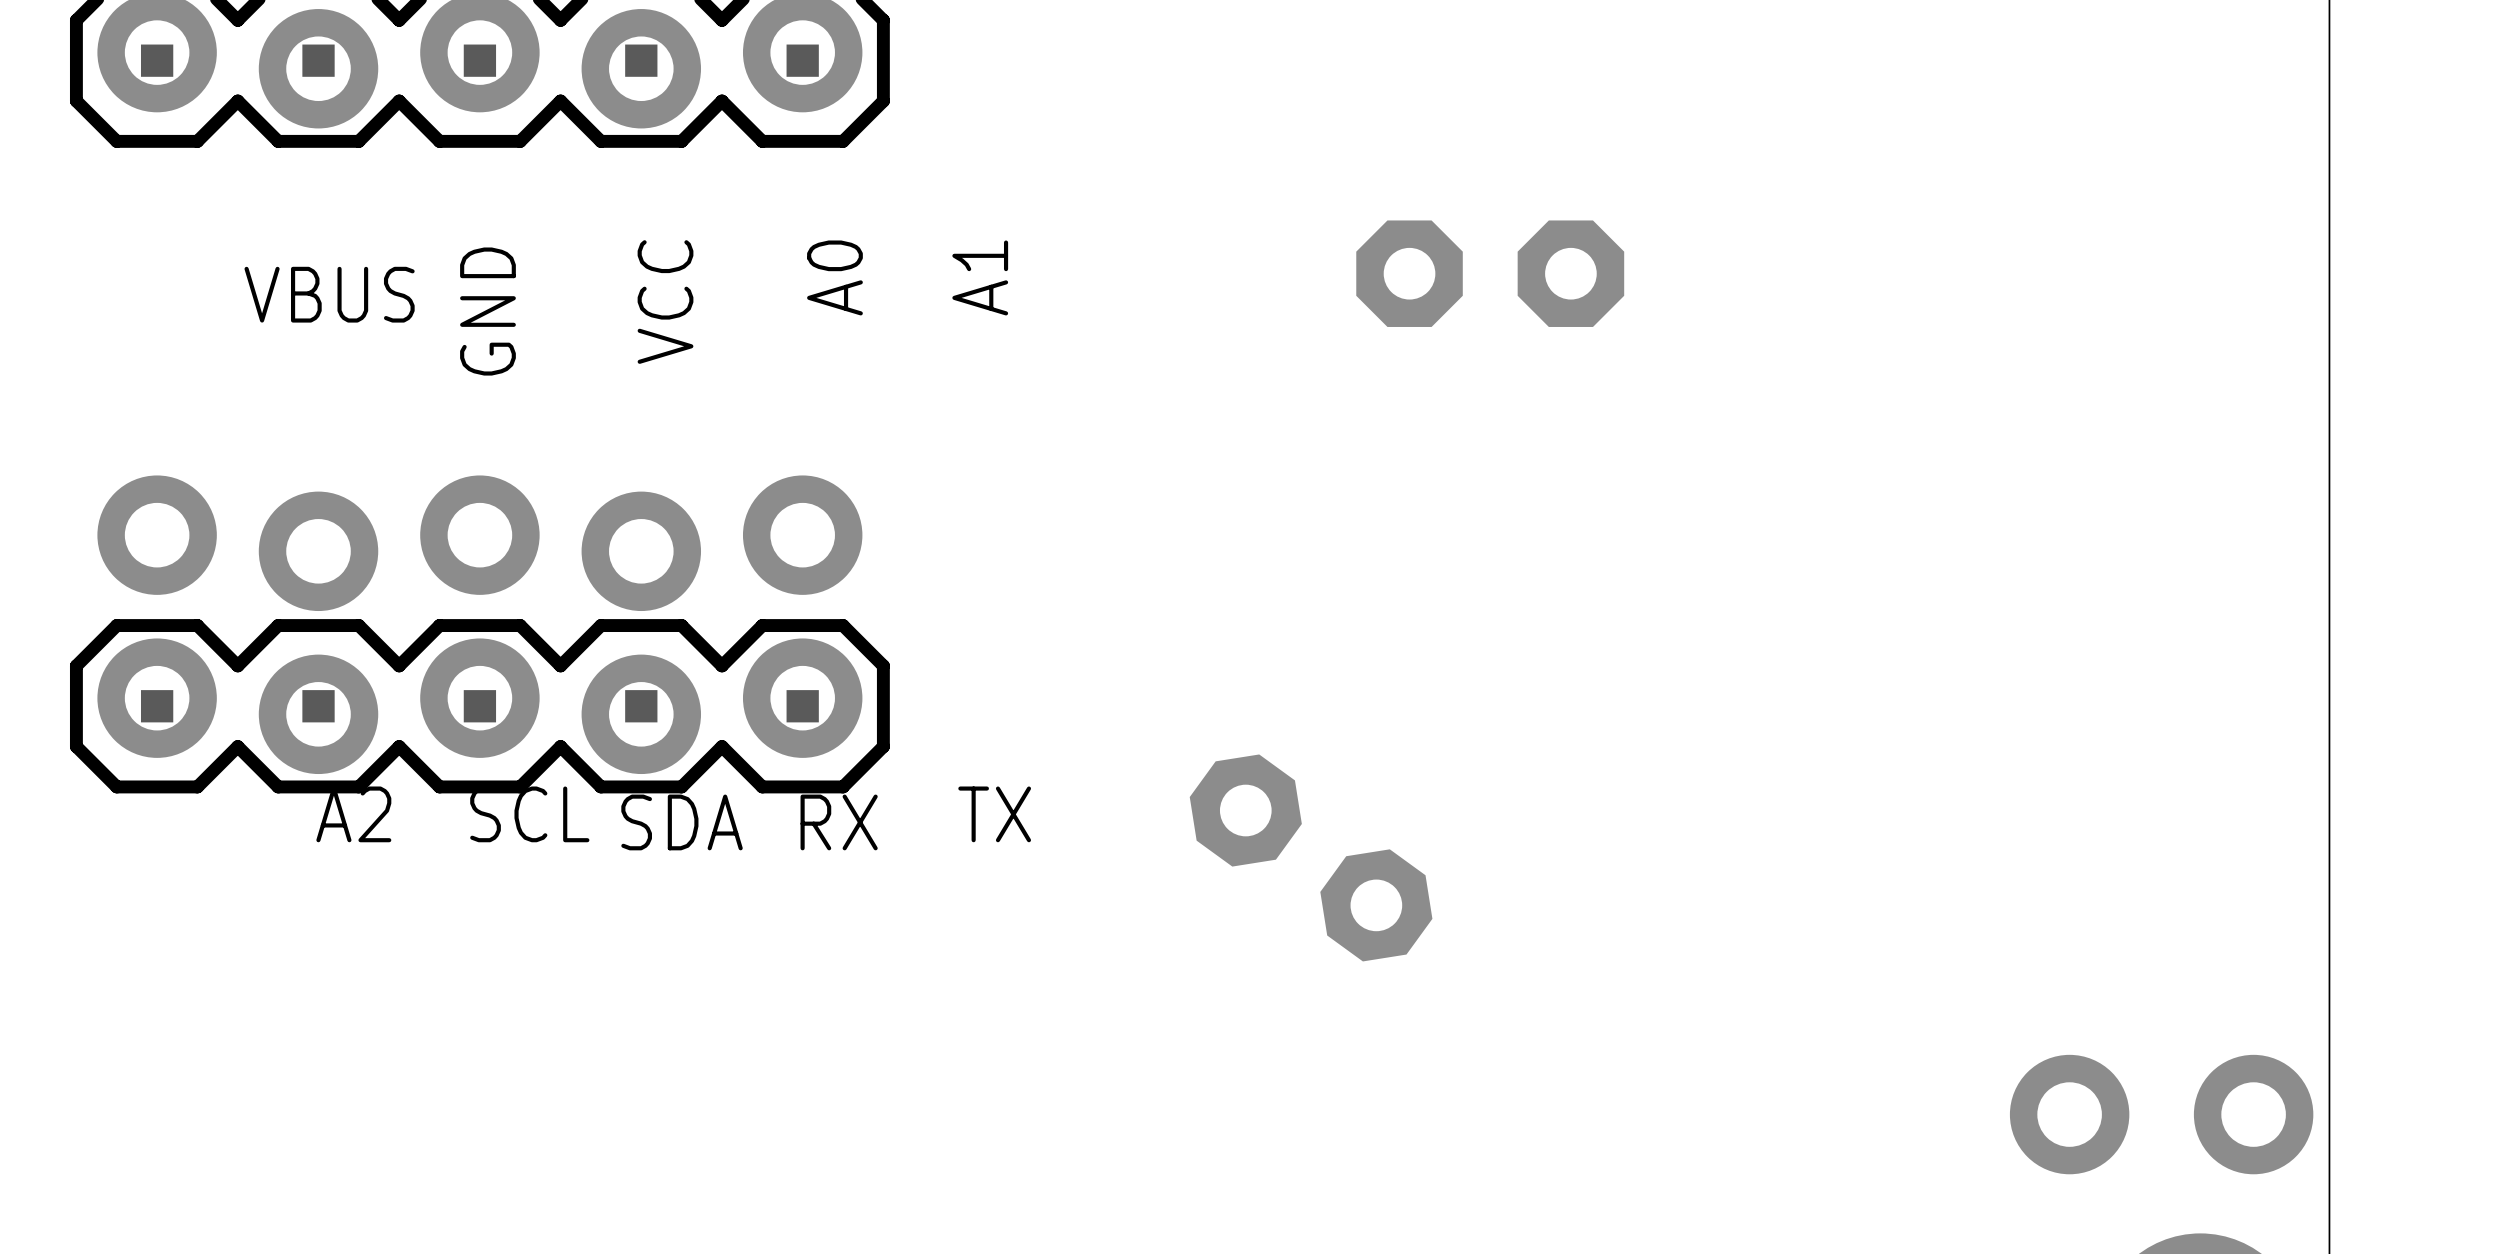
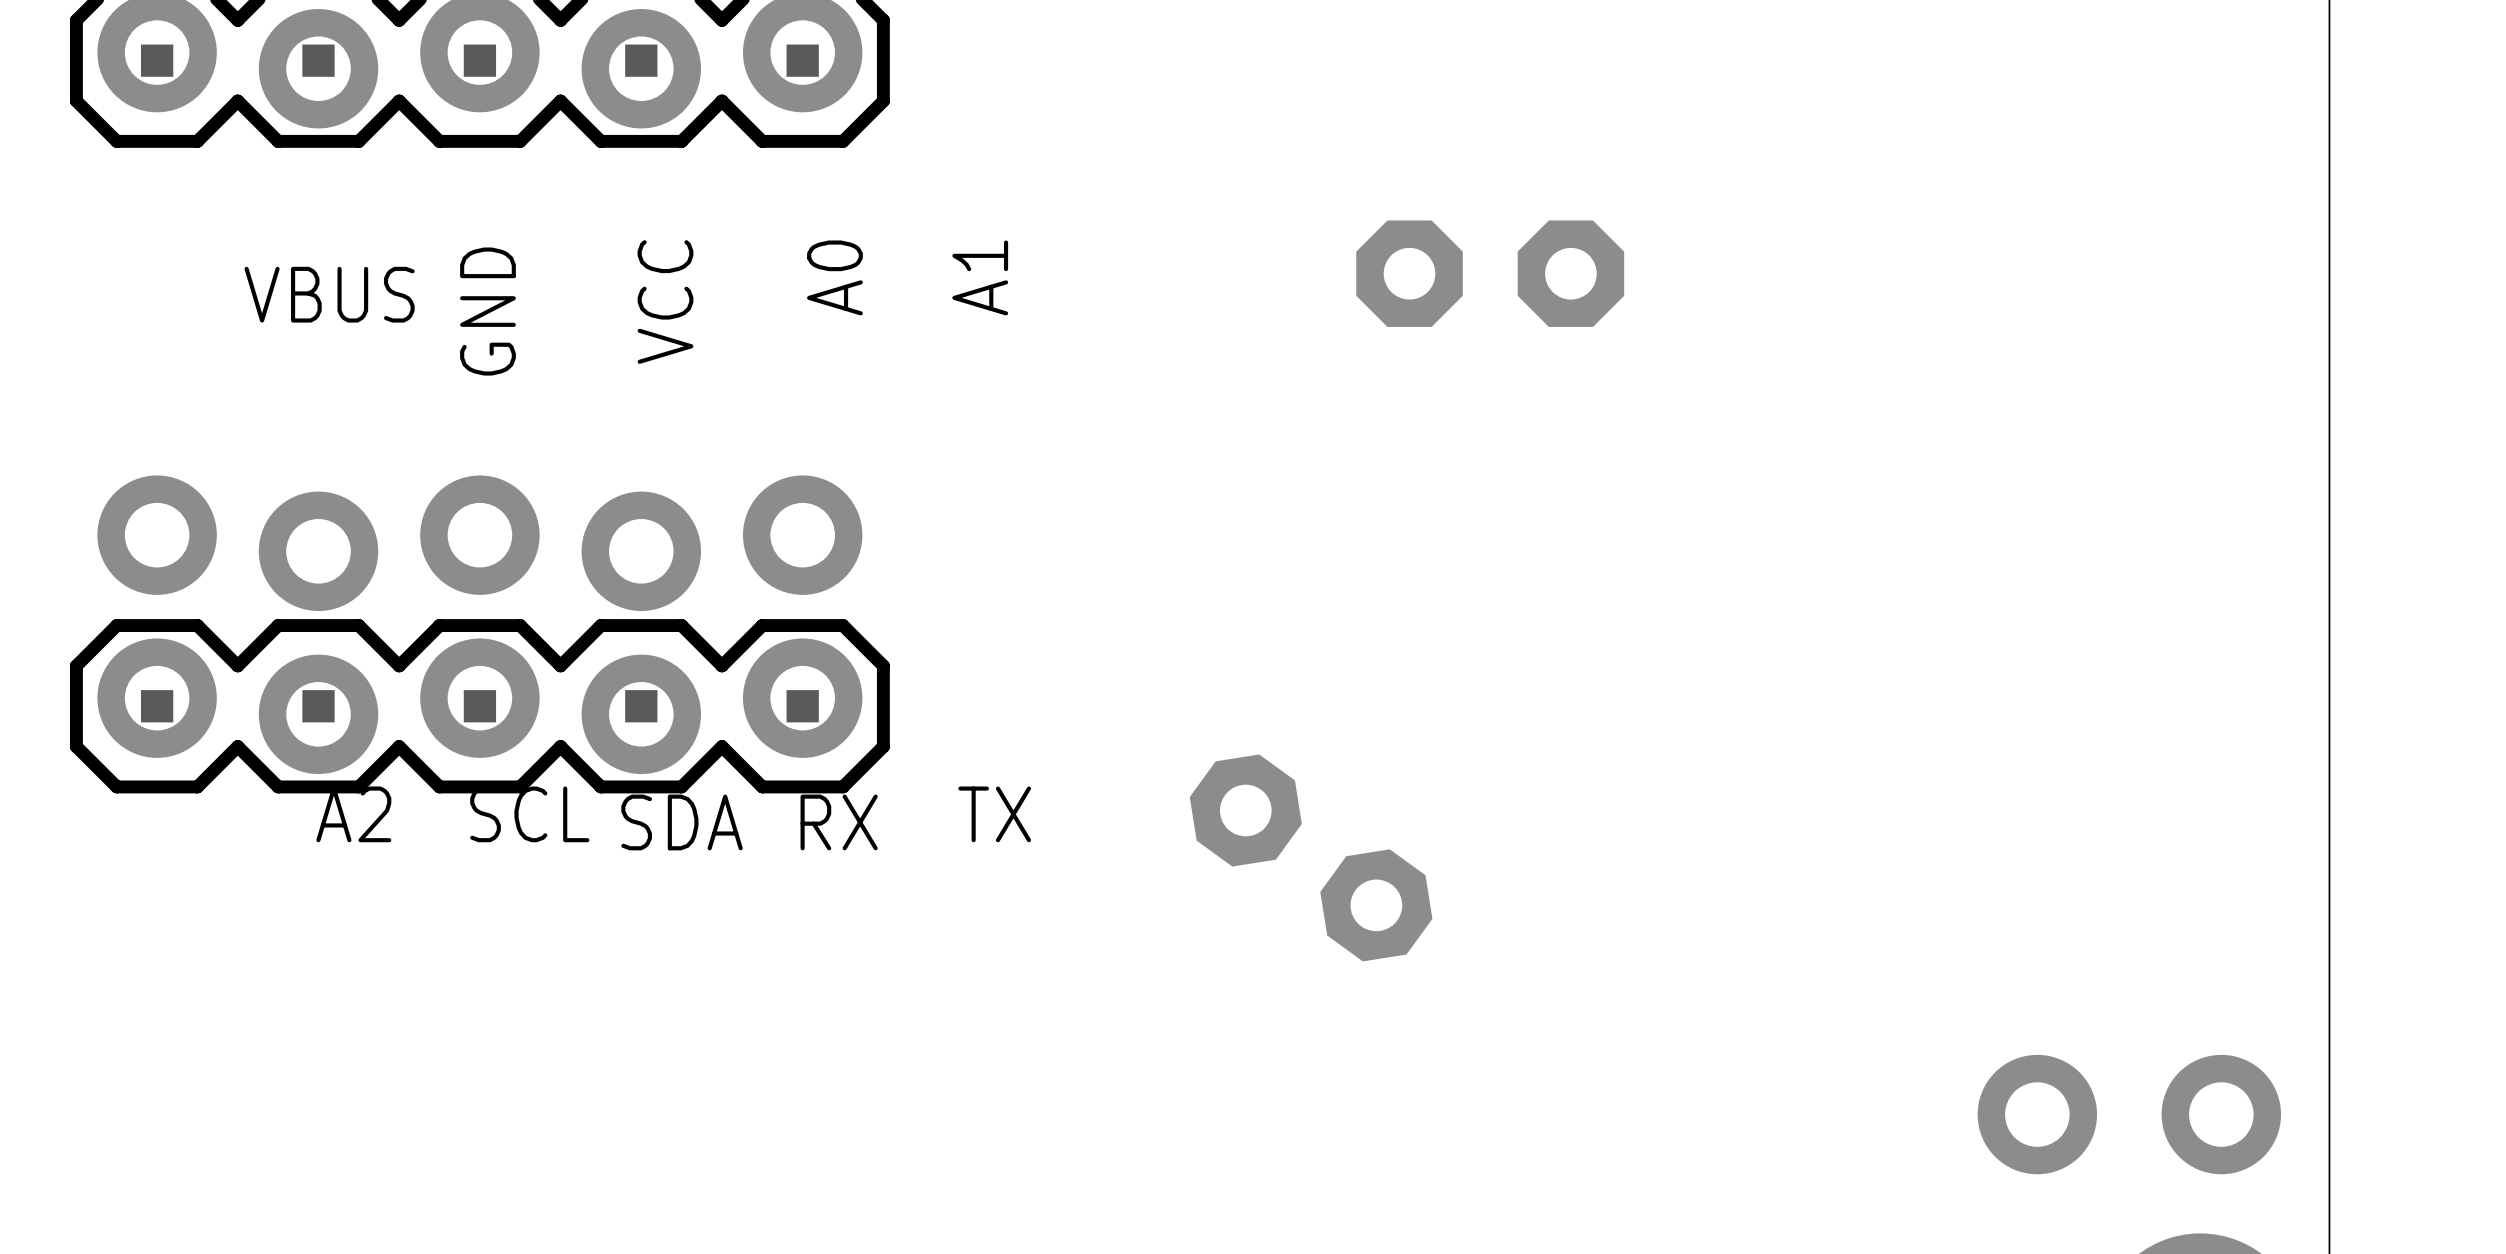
part position: (2161, 1114) -> (2129, 1114)

